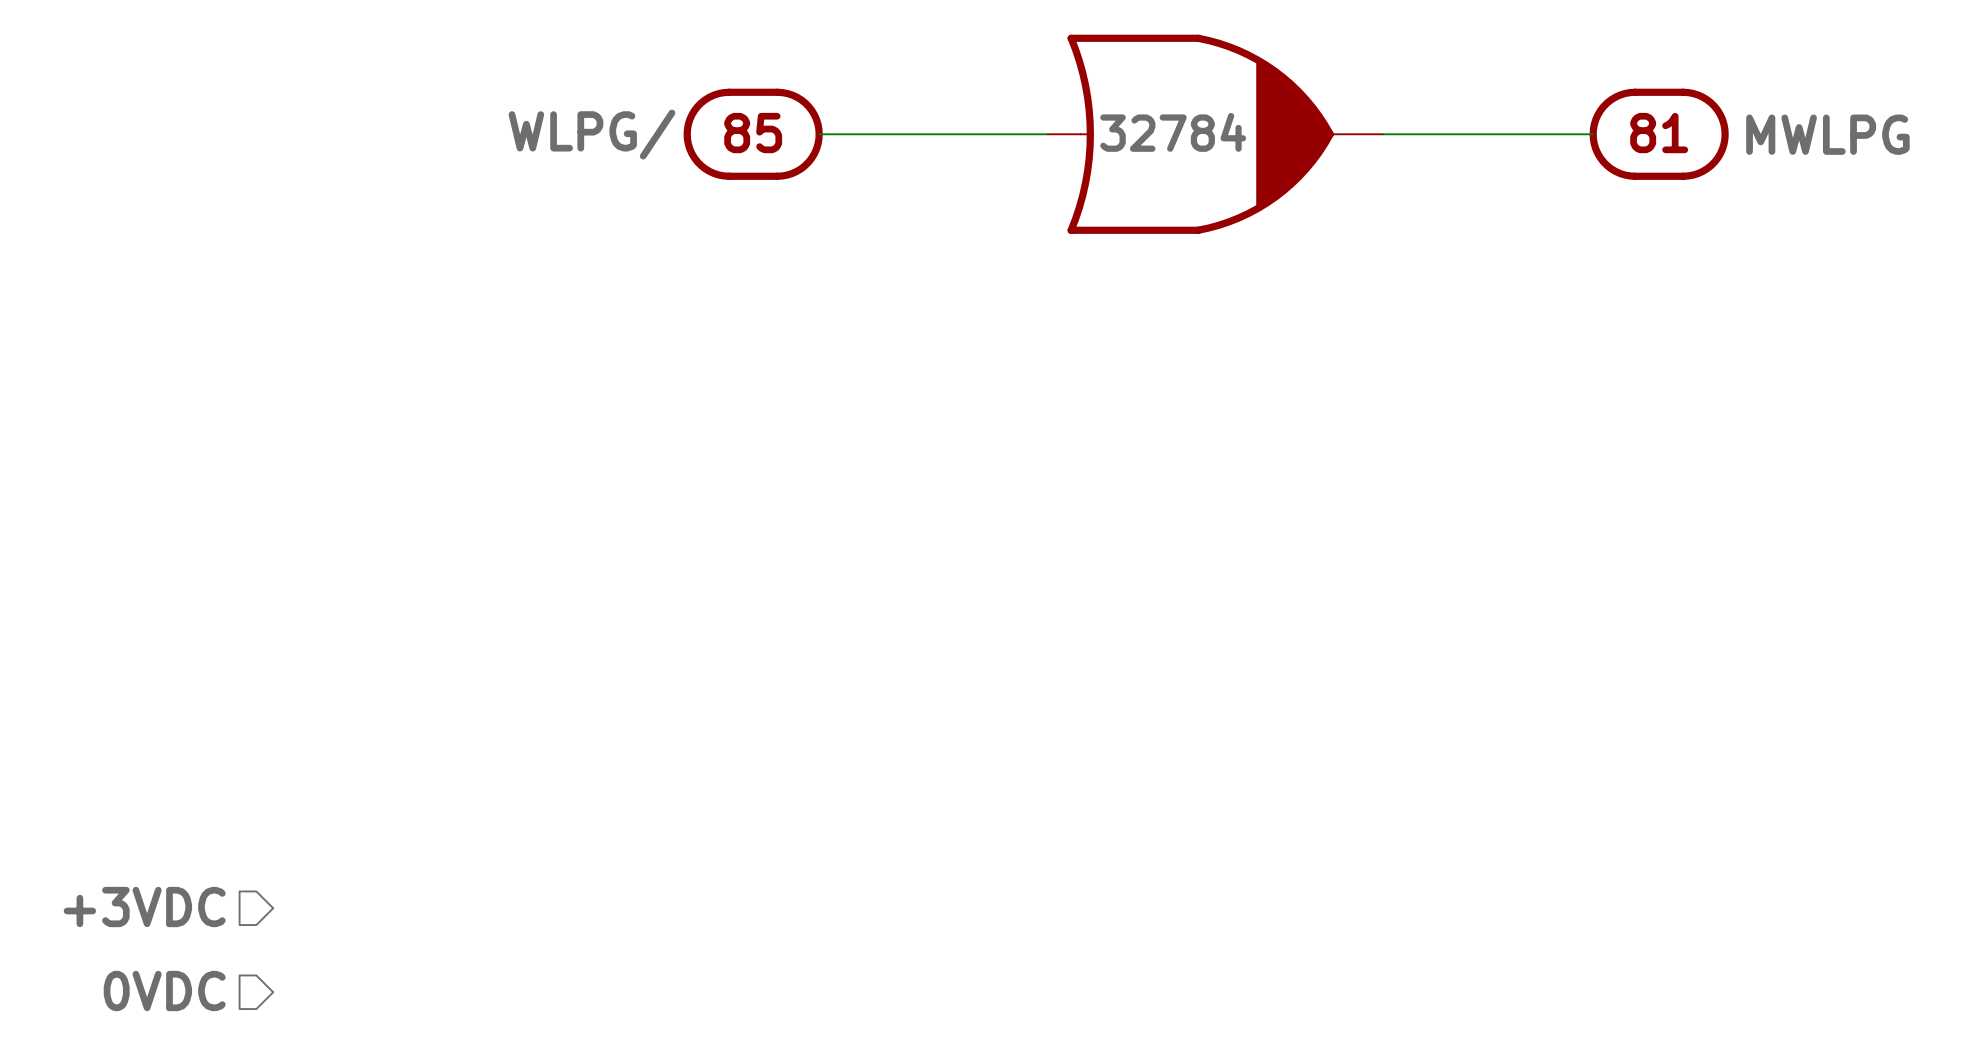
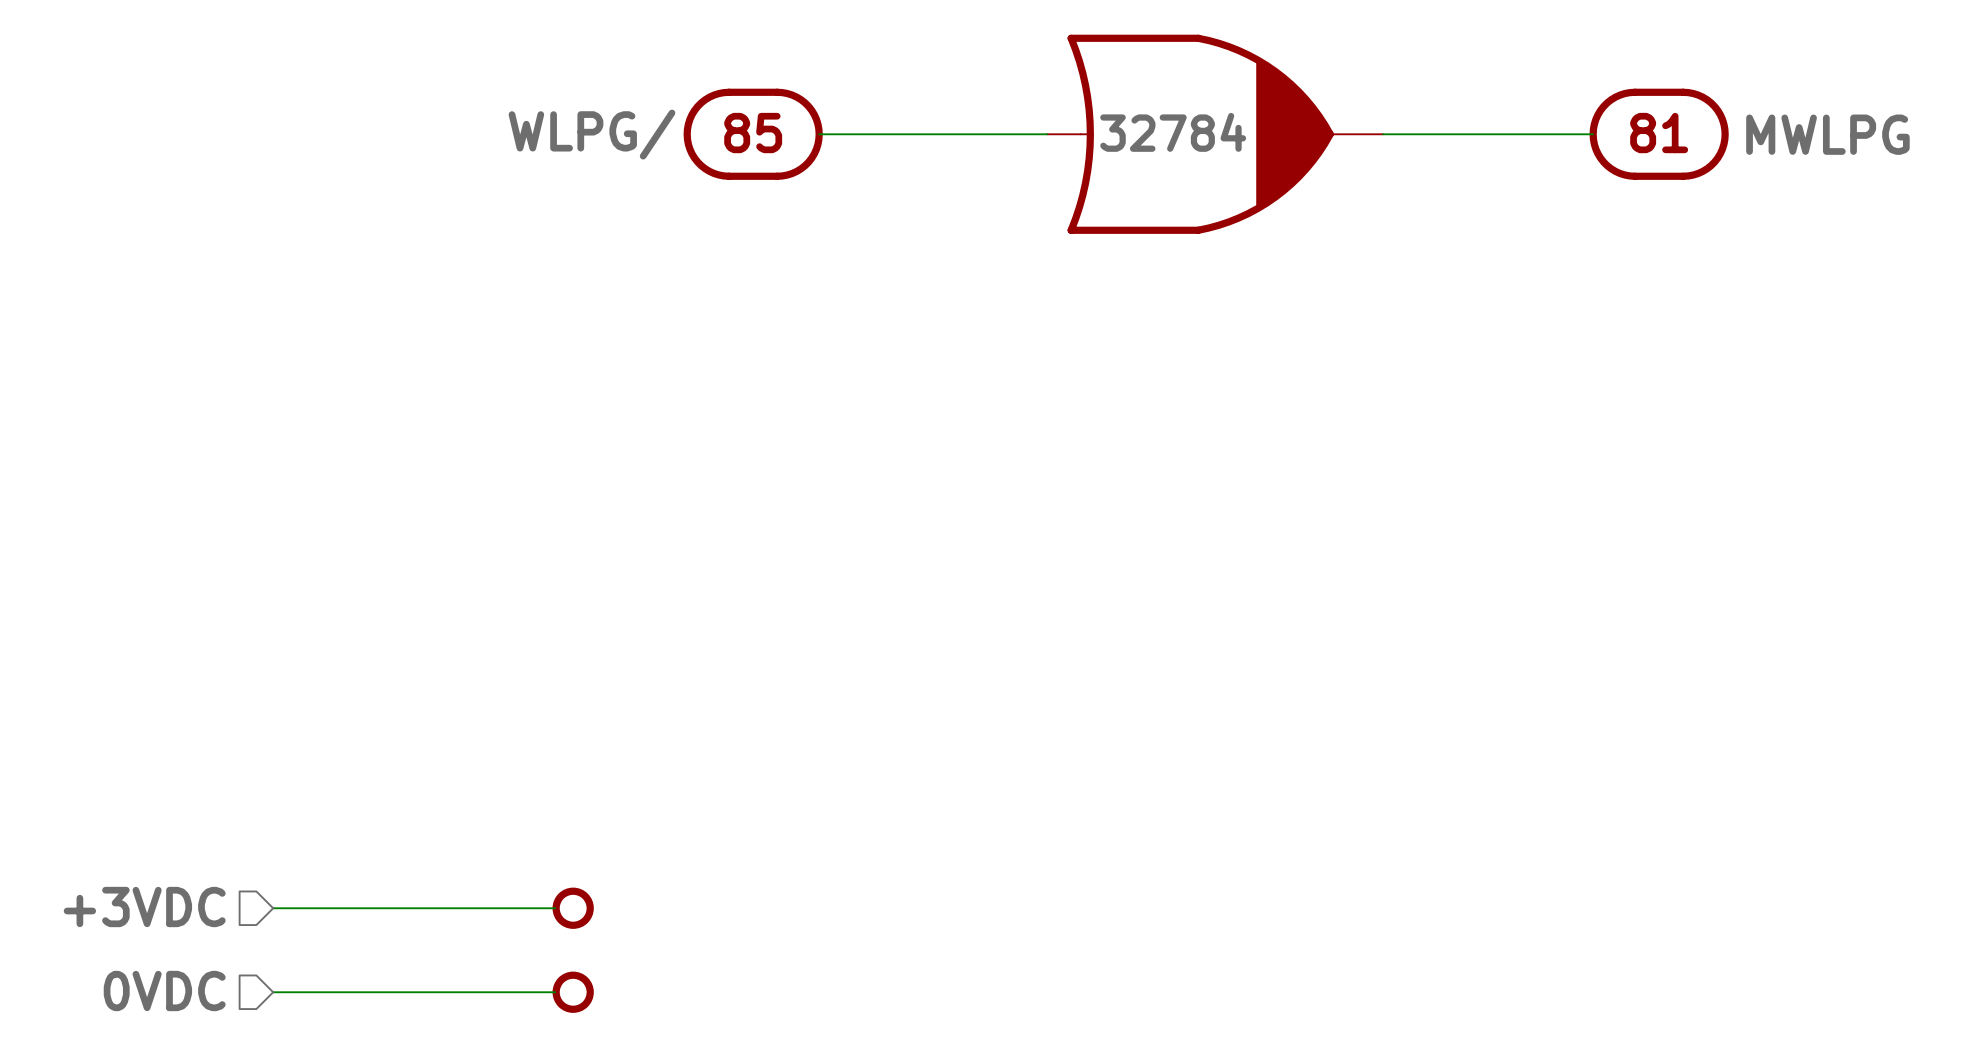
wire: none -> (273, 908) (555, 908)
part: none -> (573, 908)
wire: none -> (273, 992) (555, 992)
part: none -> (573, 992)

